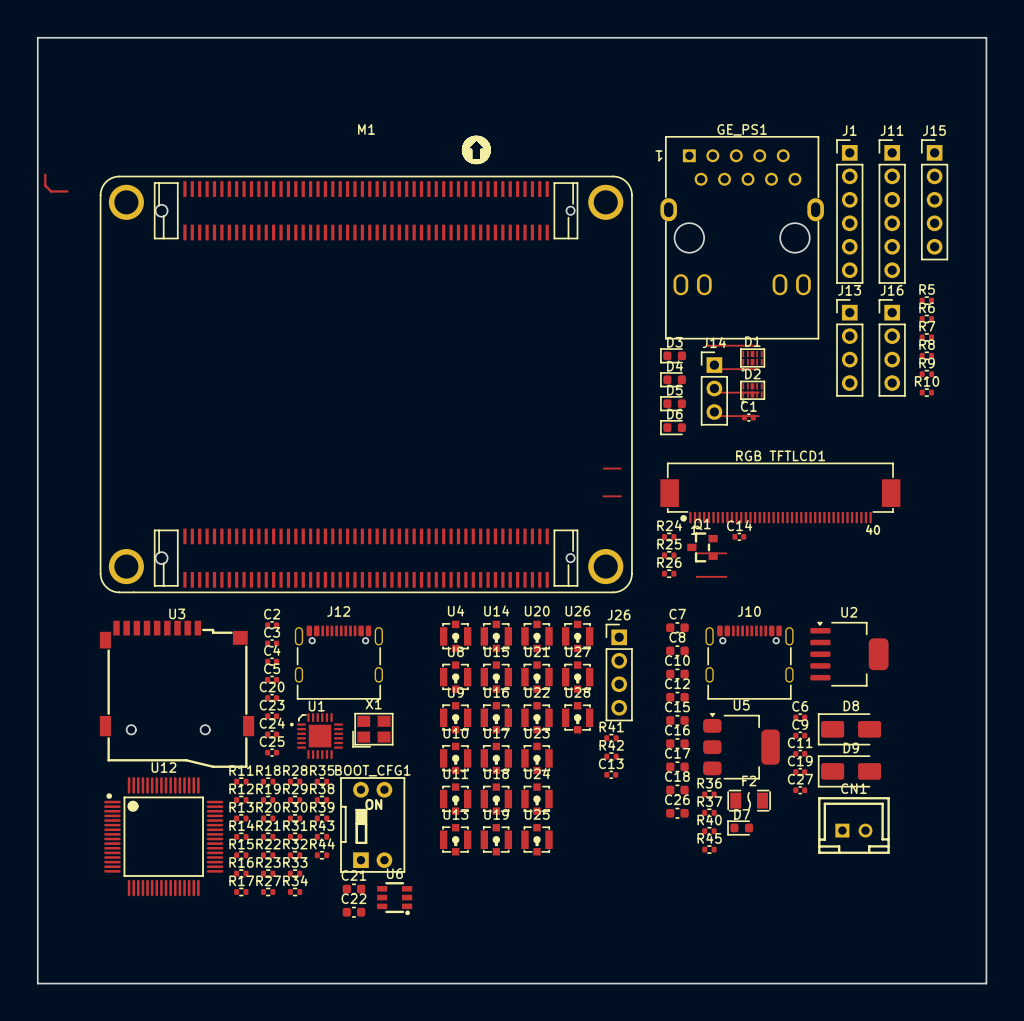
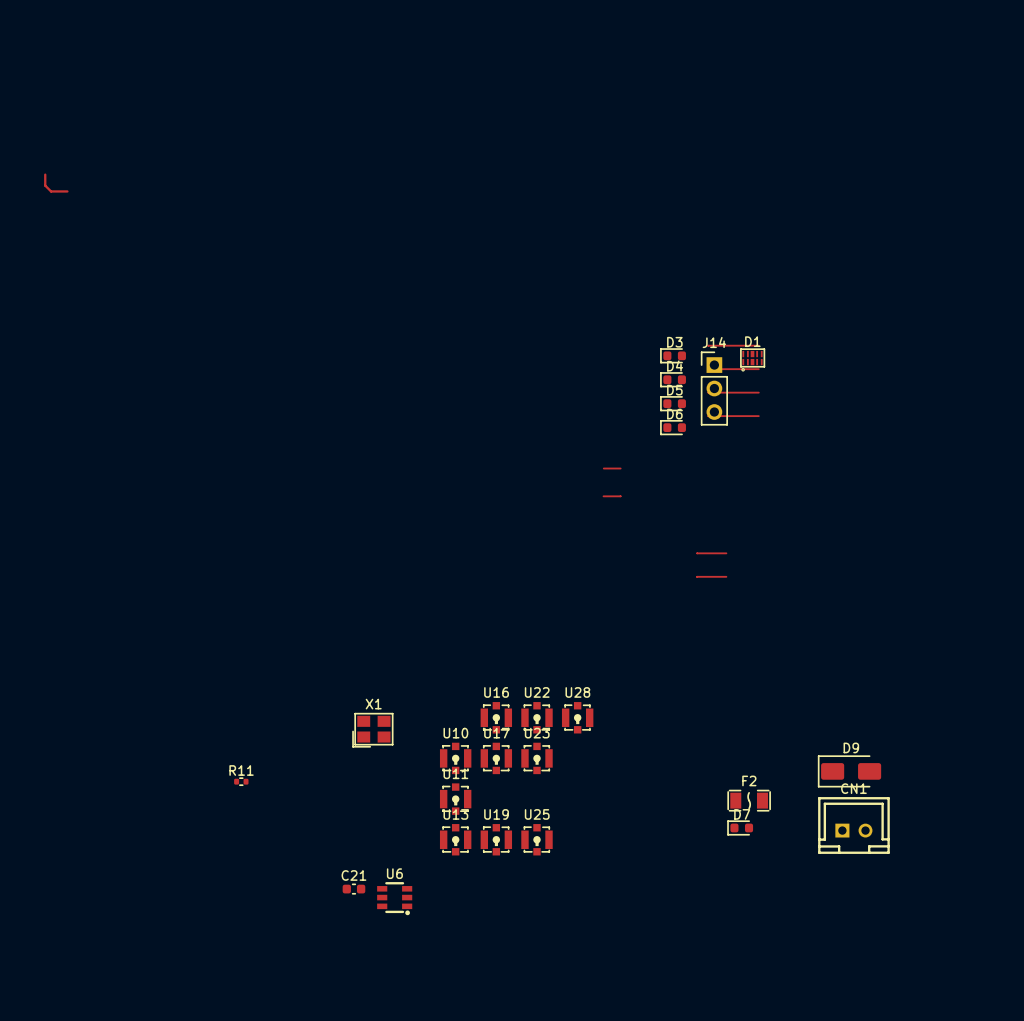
board edge: (37, 37) (986, 37) (986, 983) (37, 983) (37, 37) -> none
J15: (934, 199) -> none
J1: (849, 211) -> none
J11: (892, 211) -> none
GE_PS1: (742, 237) -> none
R5: (926, 300) -> none
R6: (926, 319) -> none
R7: (926, 337) -> none
J13: (849, 347) -> none
J16: (892, 347) -> none
R8: (926, 355) -> none
M1: (366, 364) -> none
R9: (926, 374) -> none
D2: (752, 392) -> none
R10: (926, 392) -> none
C1: (748, 417) -> none
RGB TFTLCD1: (780, 492) -> none
R24: (669, 536) -> none
C14: (739, 536) -> none
Q1: (702, 547) -> none
R25: (669, 555) -> none
R26: (669, 573) -> none
C2: (272, 625) -> none
C7: (677, 627) -> none
U4: (455, 636) -> none
U14: (496, 636) -> none
U20: (536, 636) -> none
U26: (577, 636) -> none
C3: (272, 643) -> none
C8: (677, 650) -> none
U2: (849, 654) -> none
C4: (272, 661) -> none
J12: (338, 662) -> none
J10: (749, 662) -> none
J26: (619, 672) -> none
C10: (677, 674) -> none
U8: (455, 677) -> none
U15: (496, 677) -> none
U21: (536, 677) -> none
U27: (577, 677) -> none
C5: (272, 679) -> none
U3: (177, 694) -> none
C12: (677, 697) -> none
C20: (272, 698) -> none
C23: (272, 716) -> none
U9: (455, 717) -> none
C6: (800, 717) -> none
C15: (677, 720) -> none
D8: (849, 729) -> none
C24: (272, 734) -> none
C9: (800, 735) -> none
U1: (316, 736) -> none
R41: (611, 738) -> none
C16: (677, 743) -> none
U5: (741, 746) -> none
C25: (272, 752) -> none
C11: (800, 753) -> none
R42: (611, 756) -> none
C17: (677, 766) -> none
C19: (800, 772) -> none
C13: (611, 774) -> none
R18: (268, 781) -> none
R28: (295, 781) -> none
R35: (321, 781) -> none
C18: (677, 790) -> none
C27: (800, 790) -> none
R36: (709, 794) -> none
U18: (496, 799) -> none
U24: (536, 799) -> none
R12: (241, 800) -> none
R19: (268, 800) -> none
R29: (295, 800) -> none
R38: (321, 800) -> none
R37: (709, 812) -> none
C26: (677, 813) -> none
R13: (241, 818) -> none
R20: (268, 818) -> none
R30: (295, 818) -> none
R39: (321, 818) -> none
BOOT_CFG1: (372, 824) -> none
R40: (709, 831) -> none
U12: (163, 836) -> none
R14: (241, 836) -> none
R21: (268, 836) -> none
R31: (295, 836) -> none
R43: (321, 836) -> none
R45: (709, 849) -> none
R15: (241, 855) -> none
R22: (268, 855) -> none
R32: (295, 855) -> none
R44: (321, 855) -> none
R16: (241, 873) -> none
R23: (268, 873) -> none
R33: (295, 873) -> none
R17: (241, 892) -> none
R27: (268, 892) -> none
R34: (295, 892) -> none
C22: (353, 912) -> none

